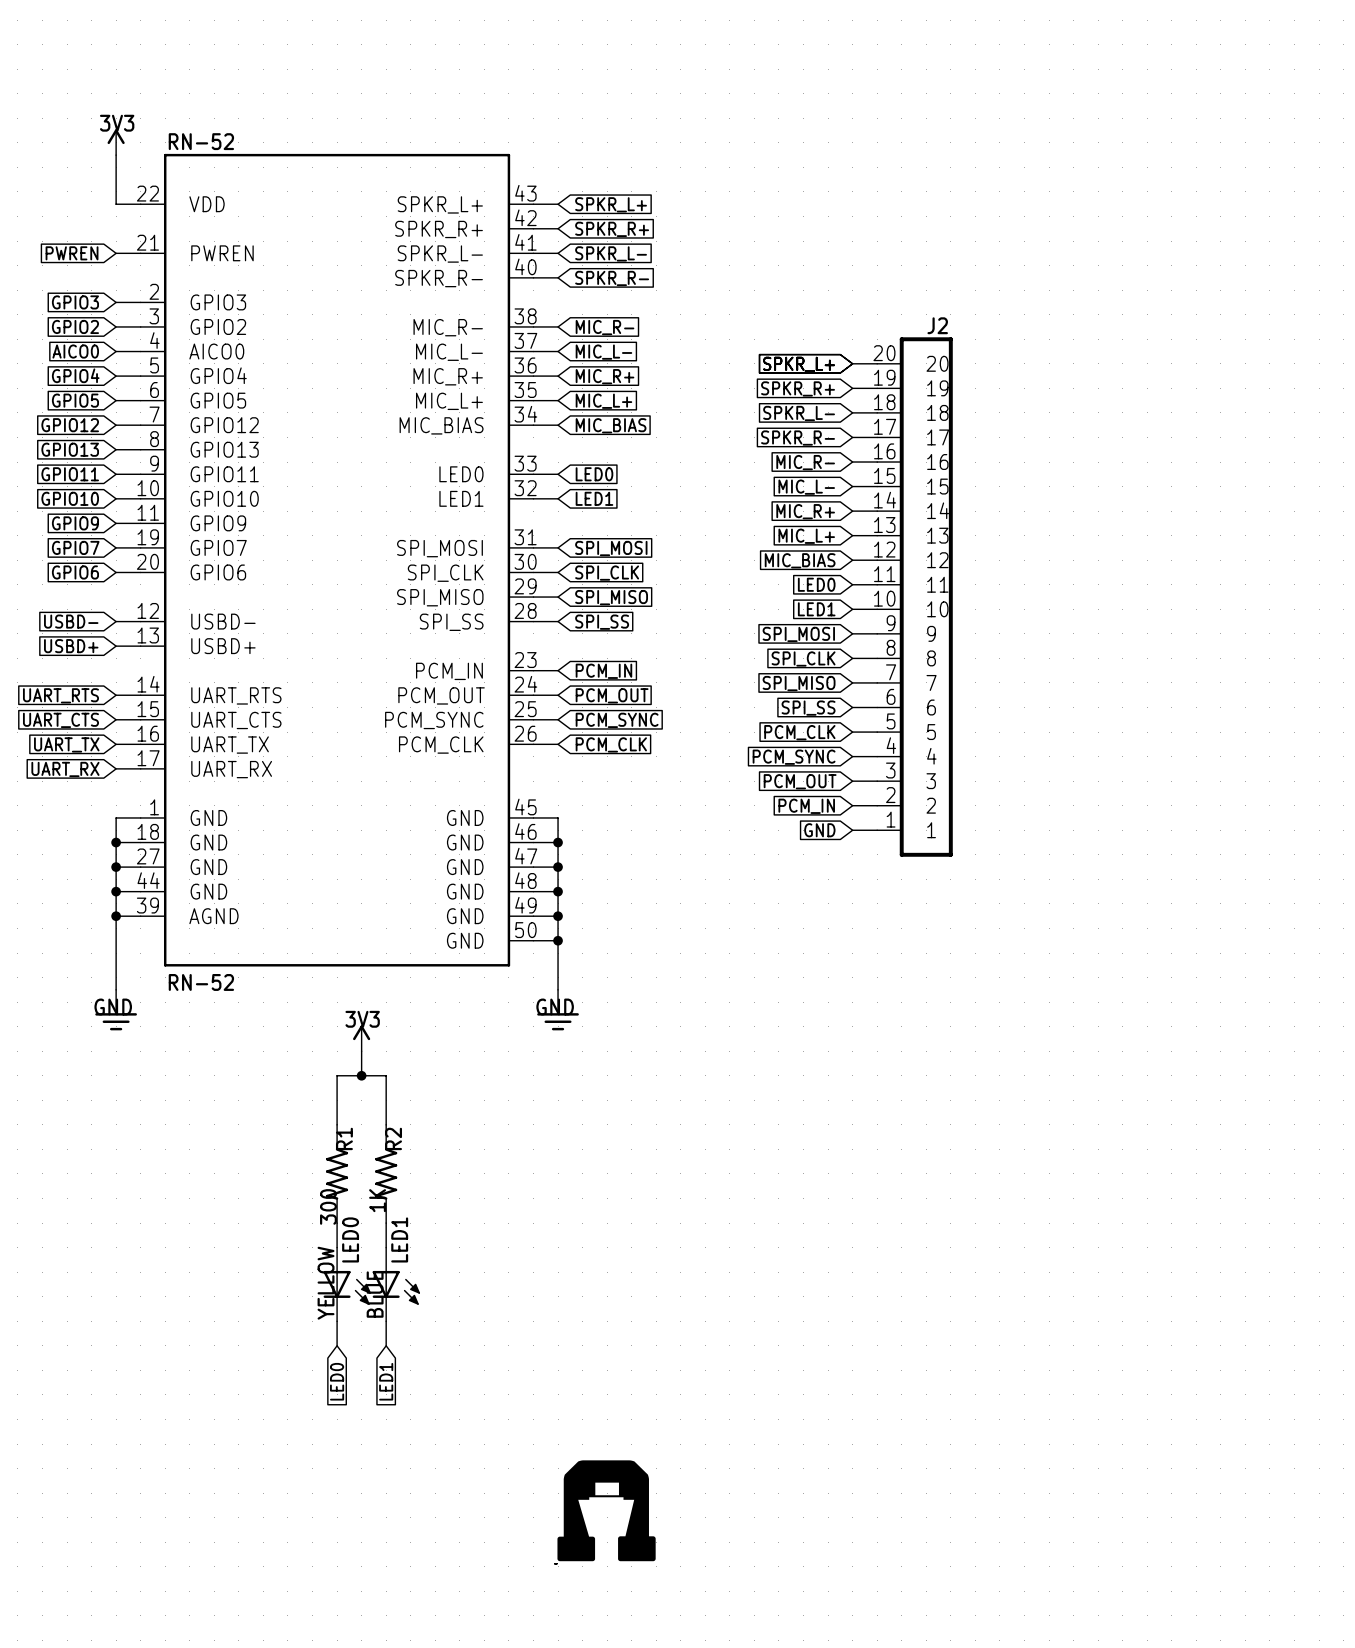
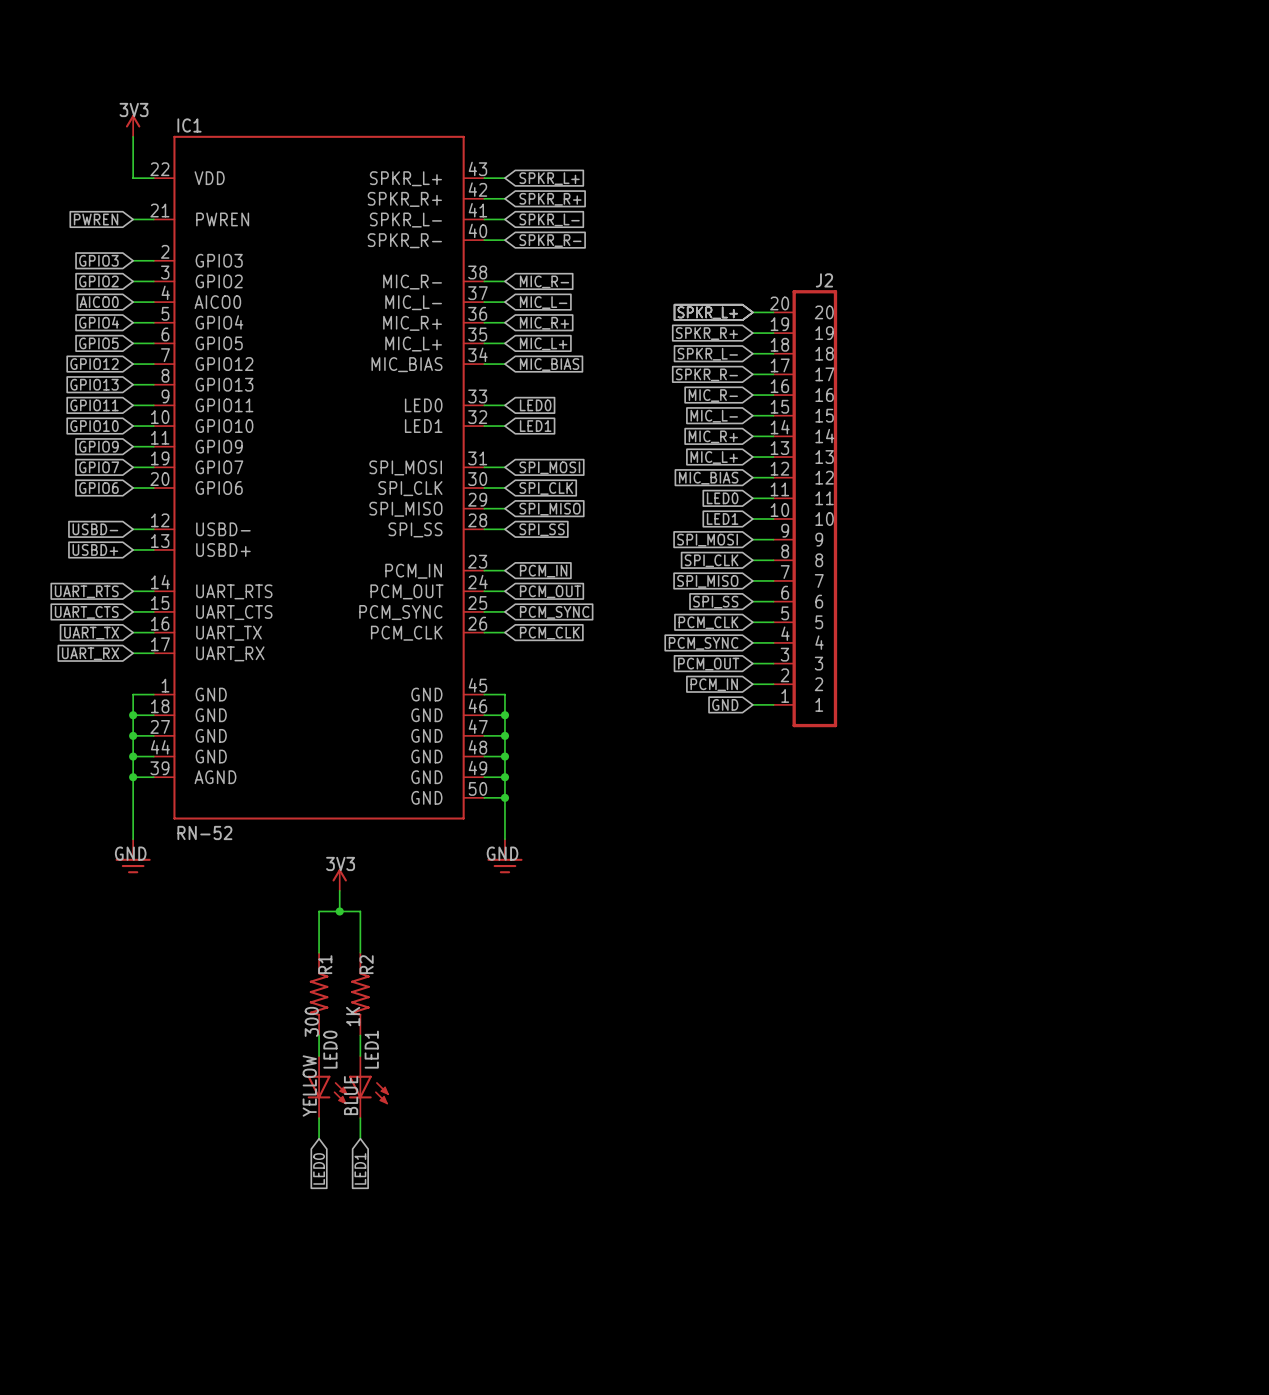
RN-52 name: RN-52 (201, 141) -> IC1 (189, 125)
part: (606, 1510) -> none

